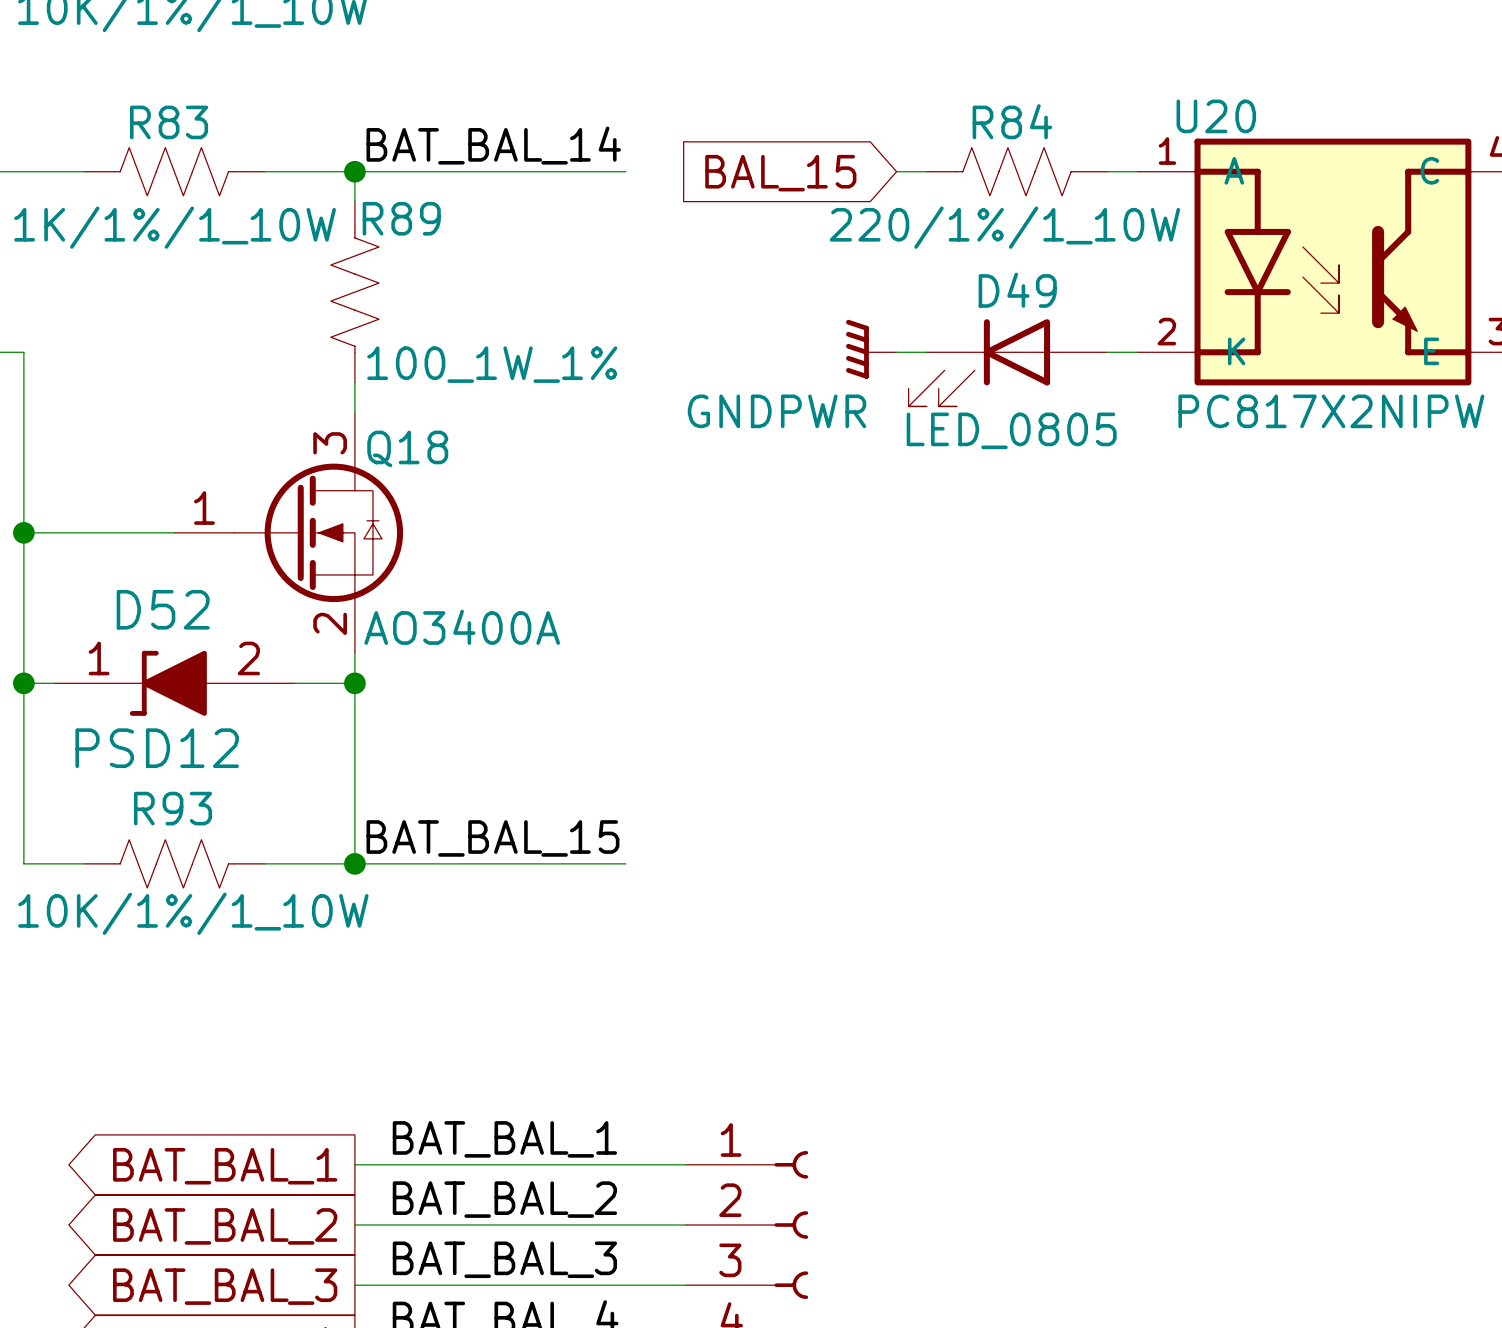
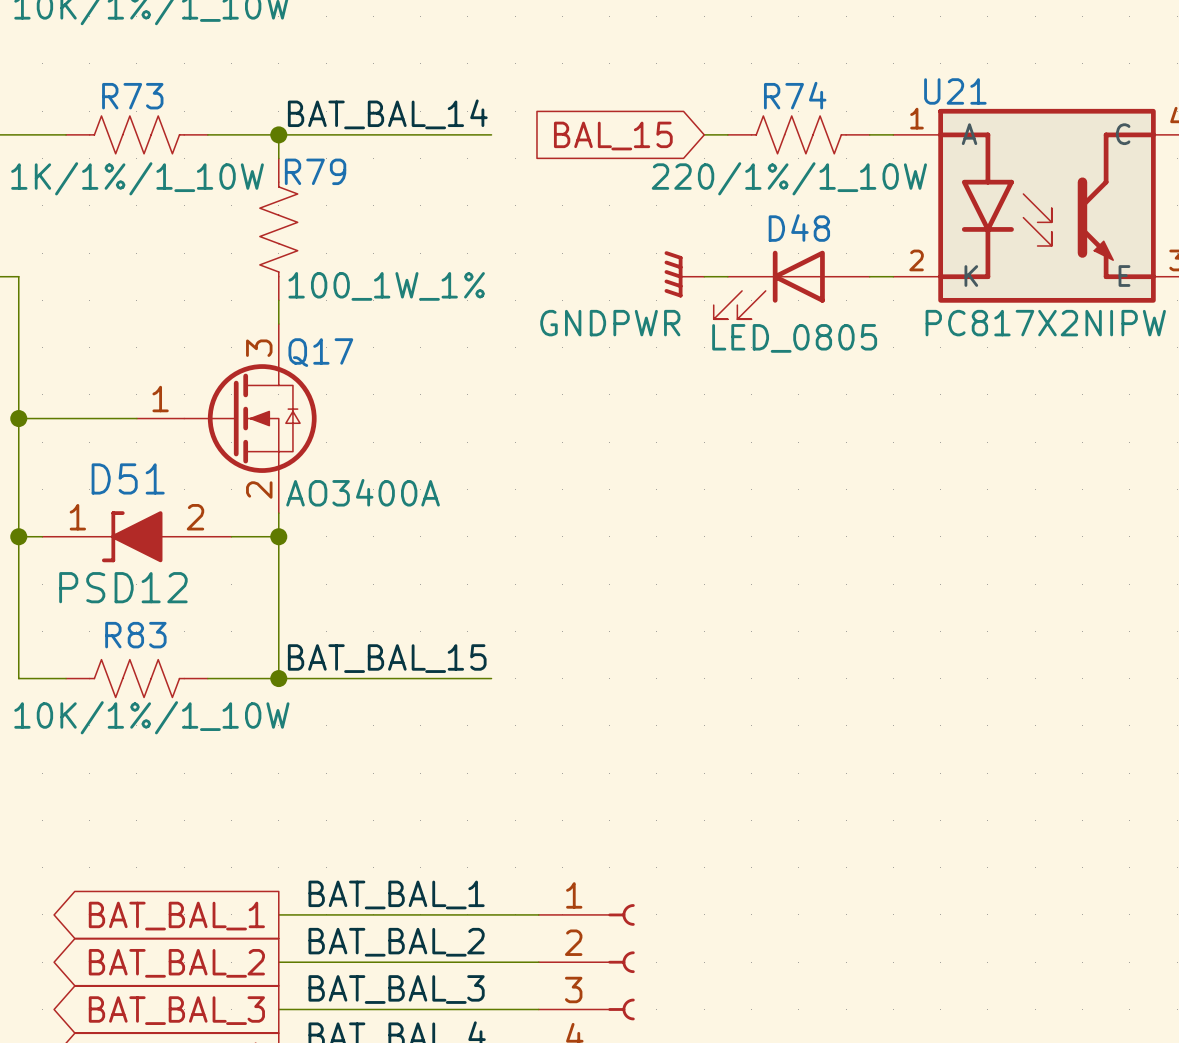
U20 name: U20 (1216, 116) -> U21 (955, 91)
R84 name: R84 (1012, 121) -> R74 (795, 95)
R83 name: R83 (169, 122) -> R73 (132, 96)
R89 name: R89 (401, 218) -> R79 (315, 171)
D49 name: D49 (1017, 290) -> D48 (799, 227)
Q18 name: Q18 (407, 448) -> Q17 (320, 352)
D52 name: D52 (163, 609) -> D51 (128, 478)
R93 name: R93 (173, 808) -> R83 (135, 635)

